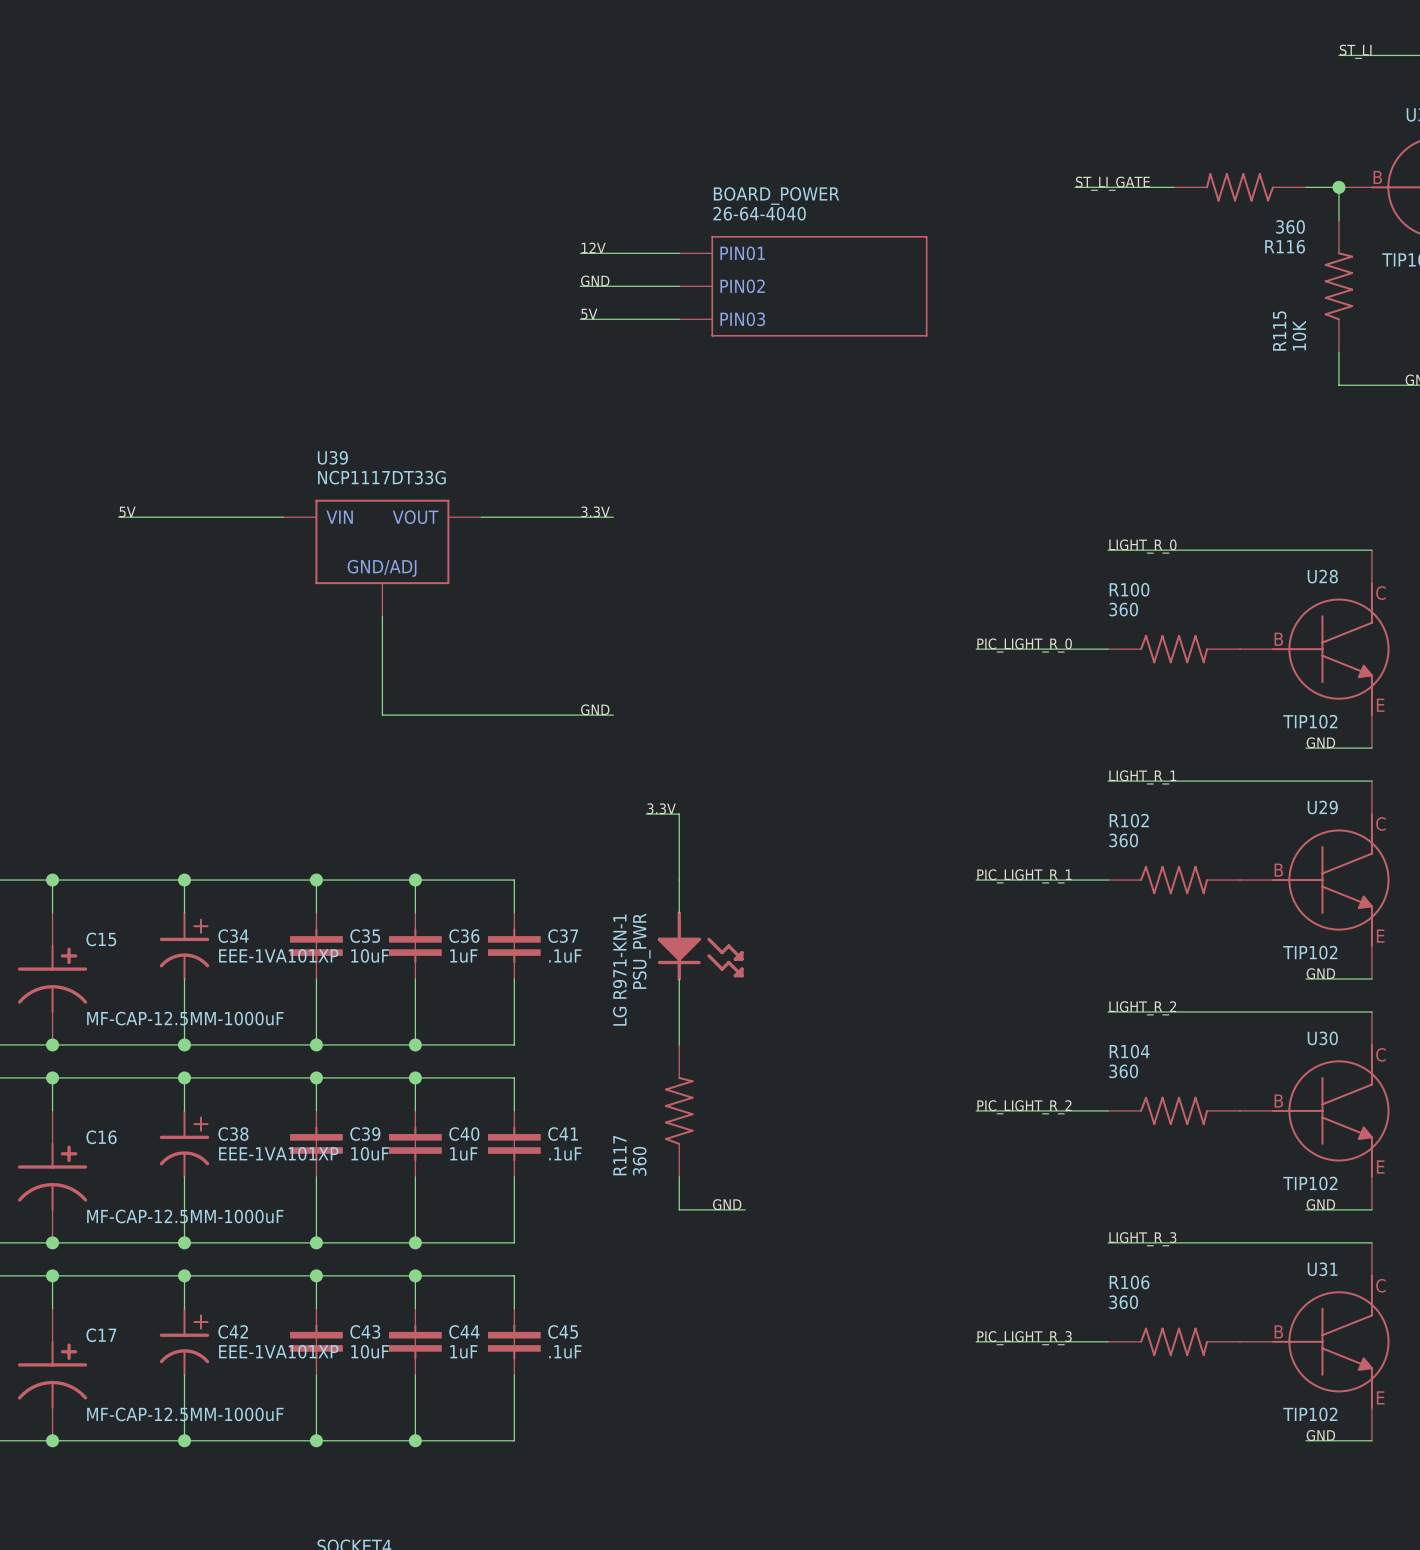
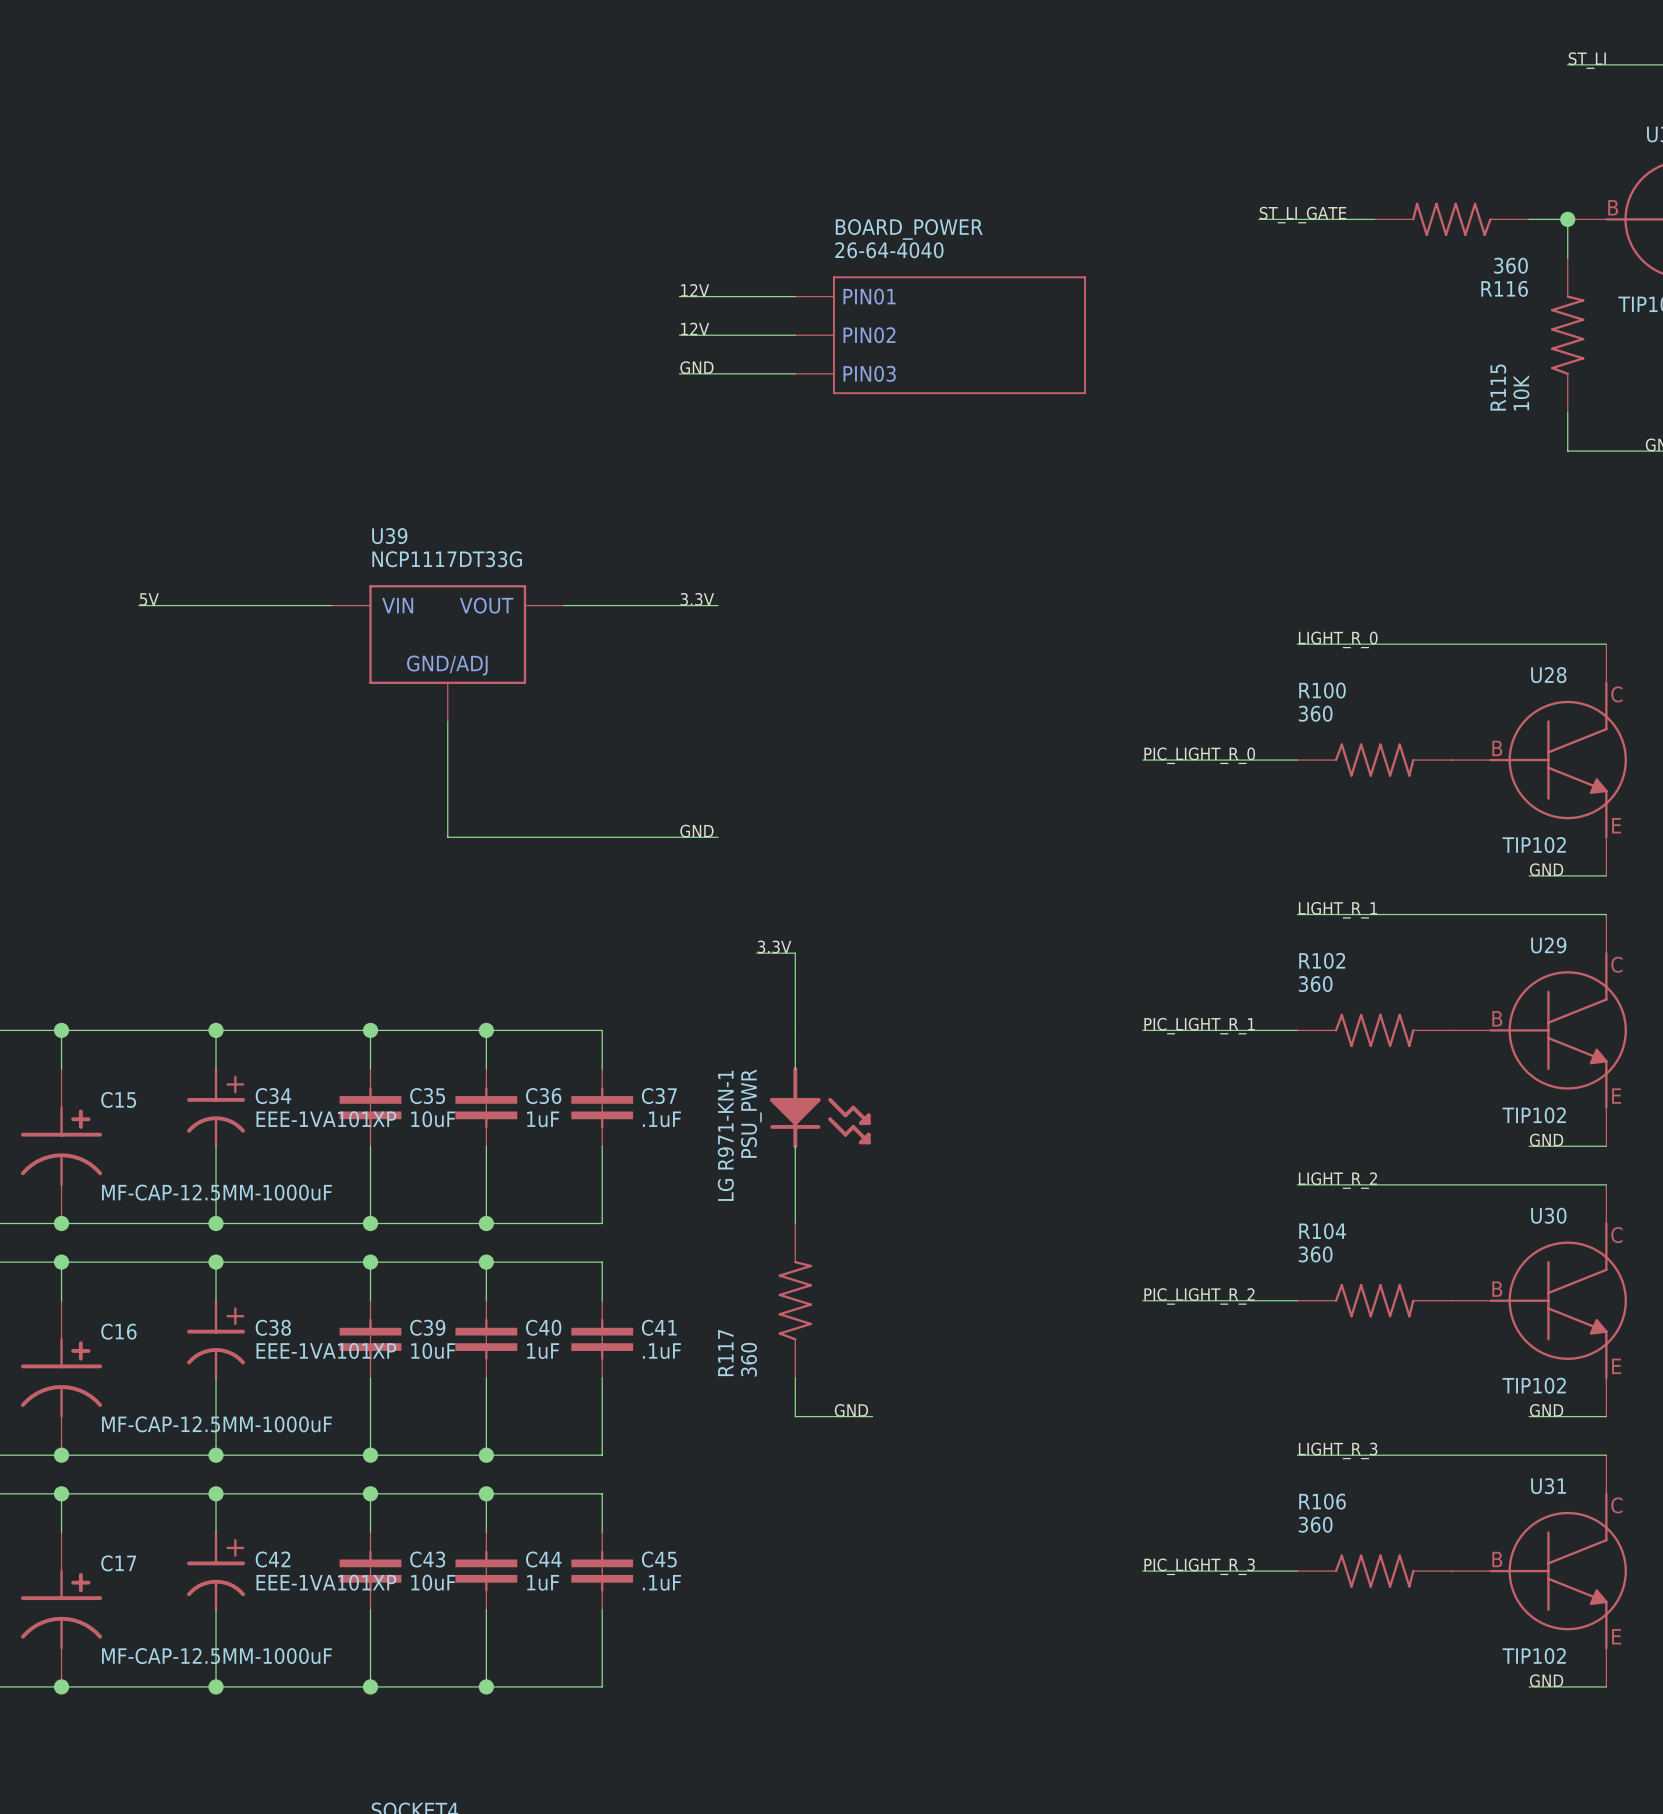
label: GND (595, 281) -> 12V (695, 328)
label: 5V (589, 314) -> GND (696, 367)

